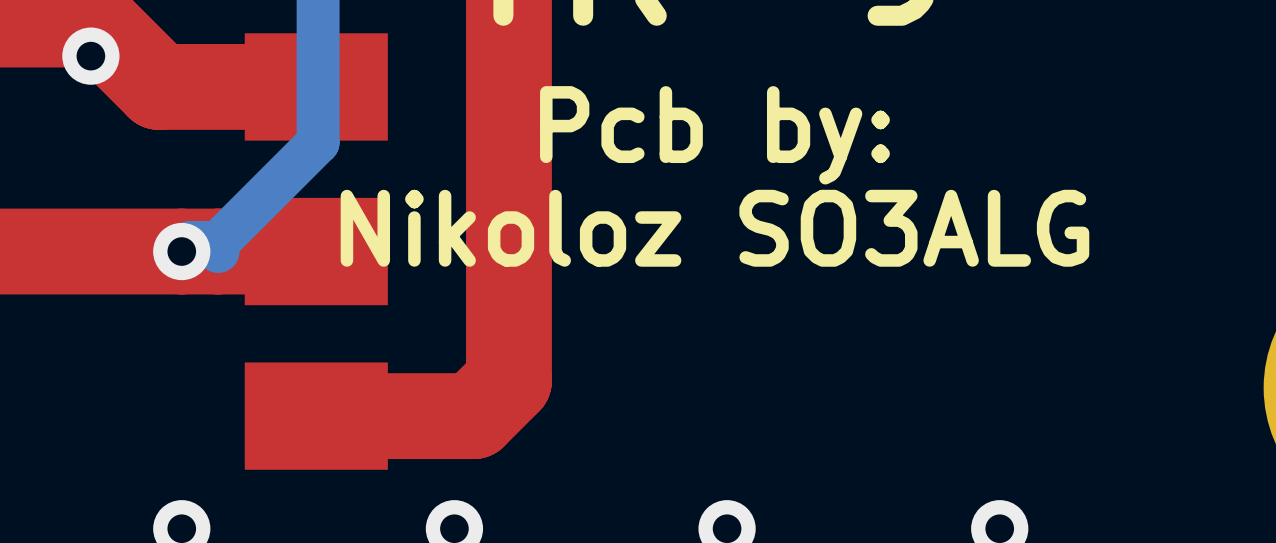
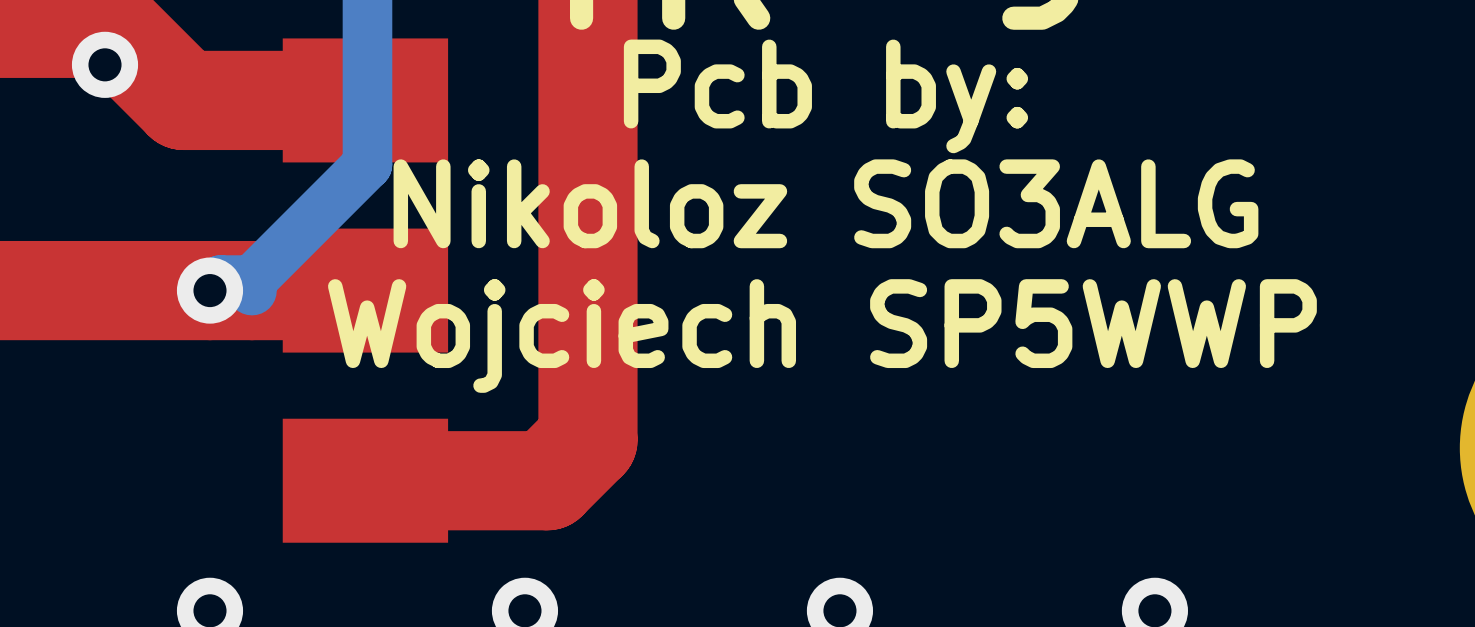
text position: Pcb by: (714, 135) -> Pcb by: (825, 96)
text position: Nikoloz SO3ALG (714, 228) -> Nikoloz SO3ALG (825, 203)
text: none -> Wojciech SP5WWP (822, 336)

